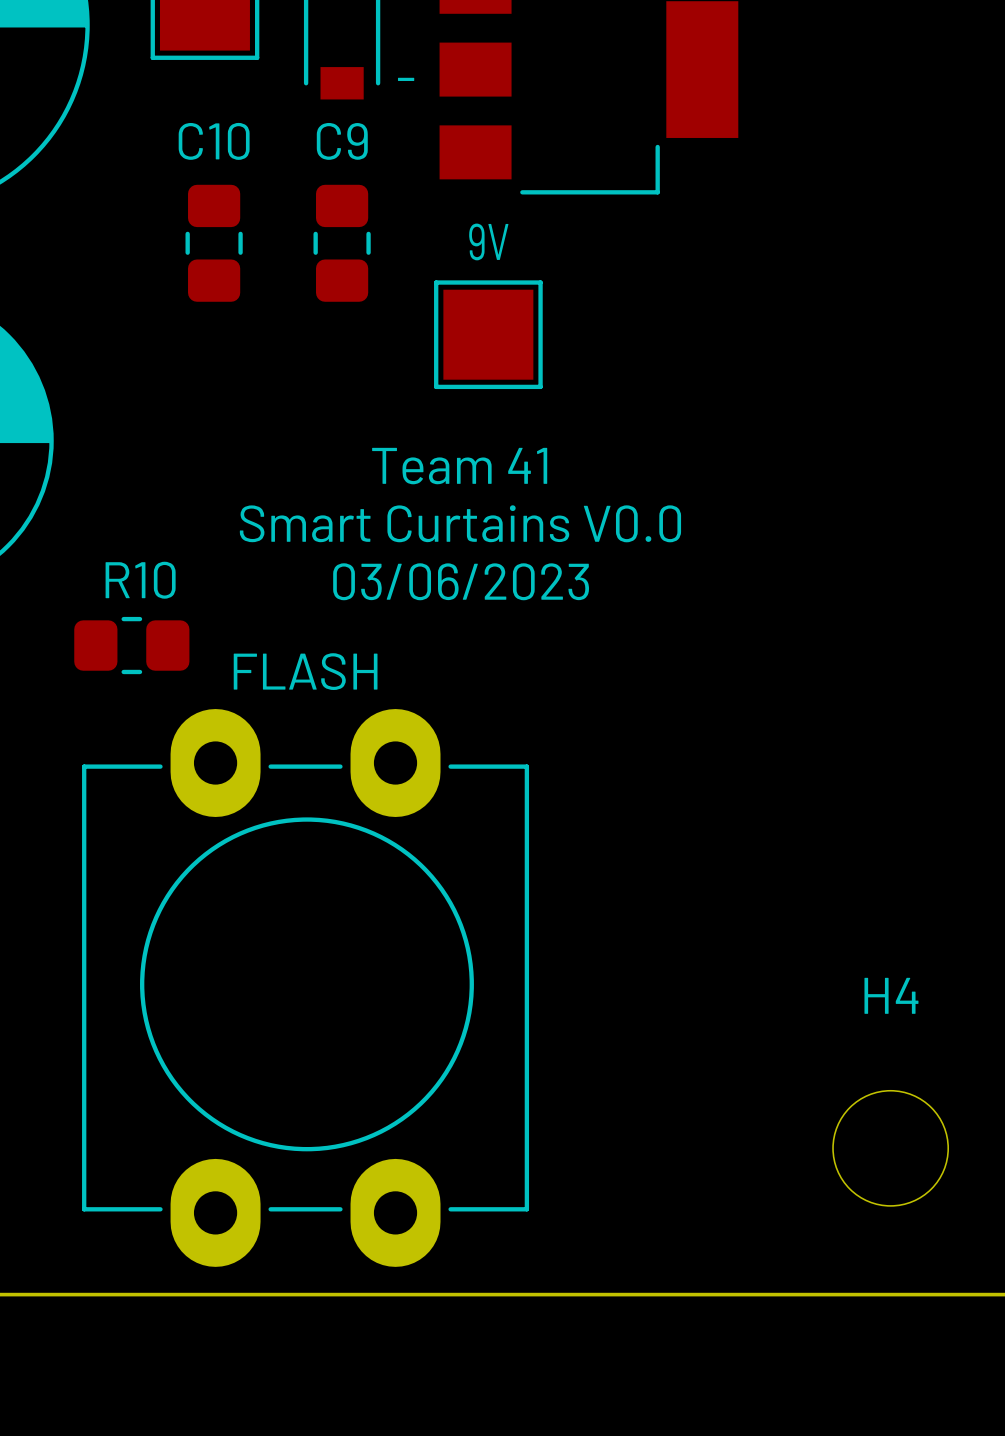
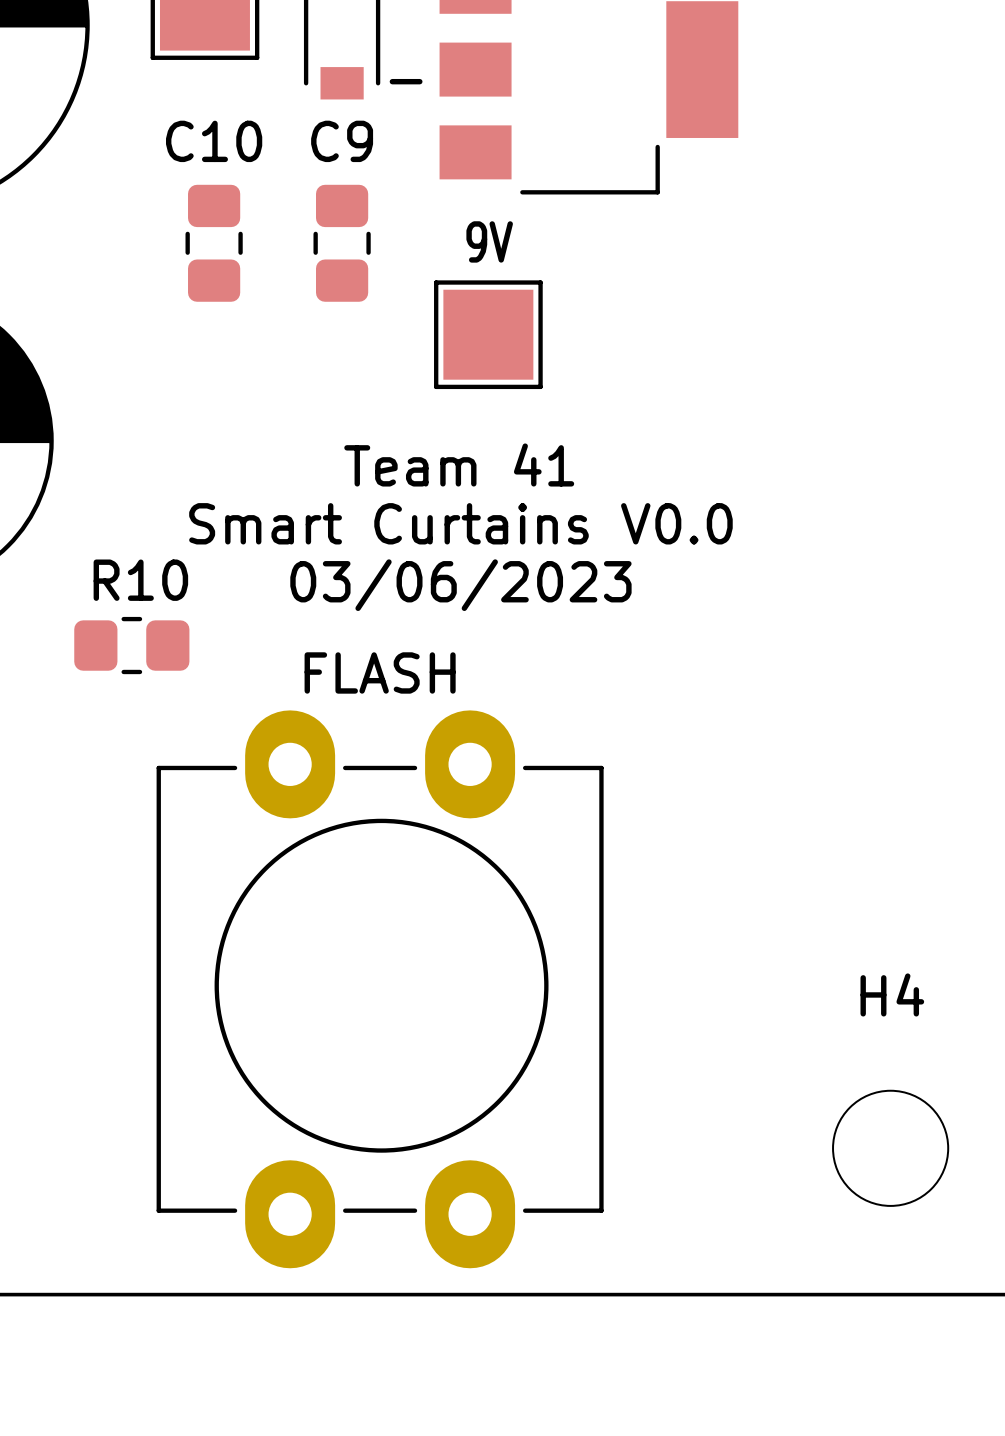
part position: (305, 987) -> (380, 989)

